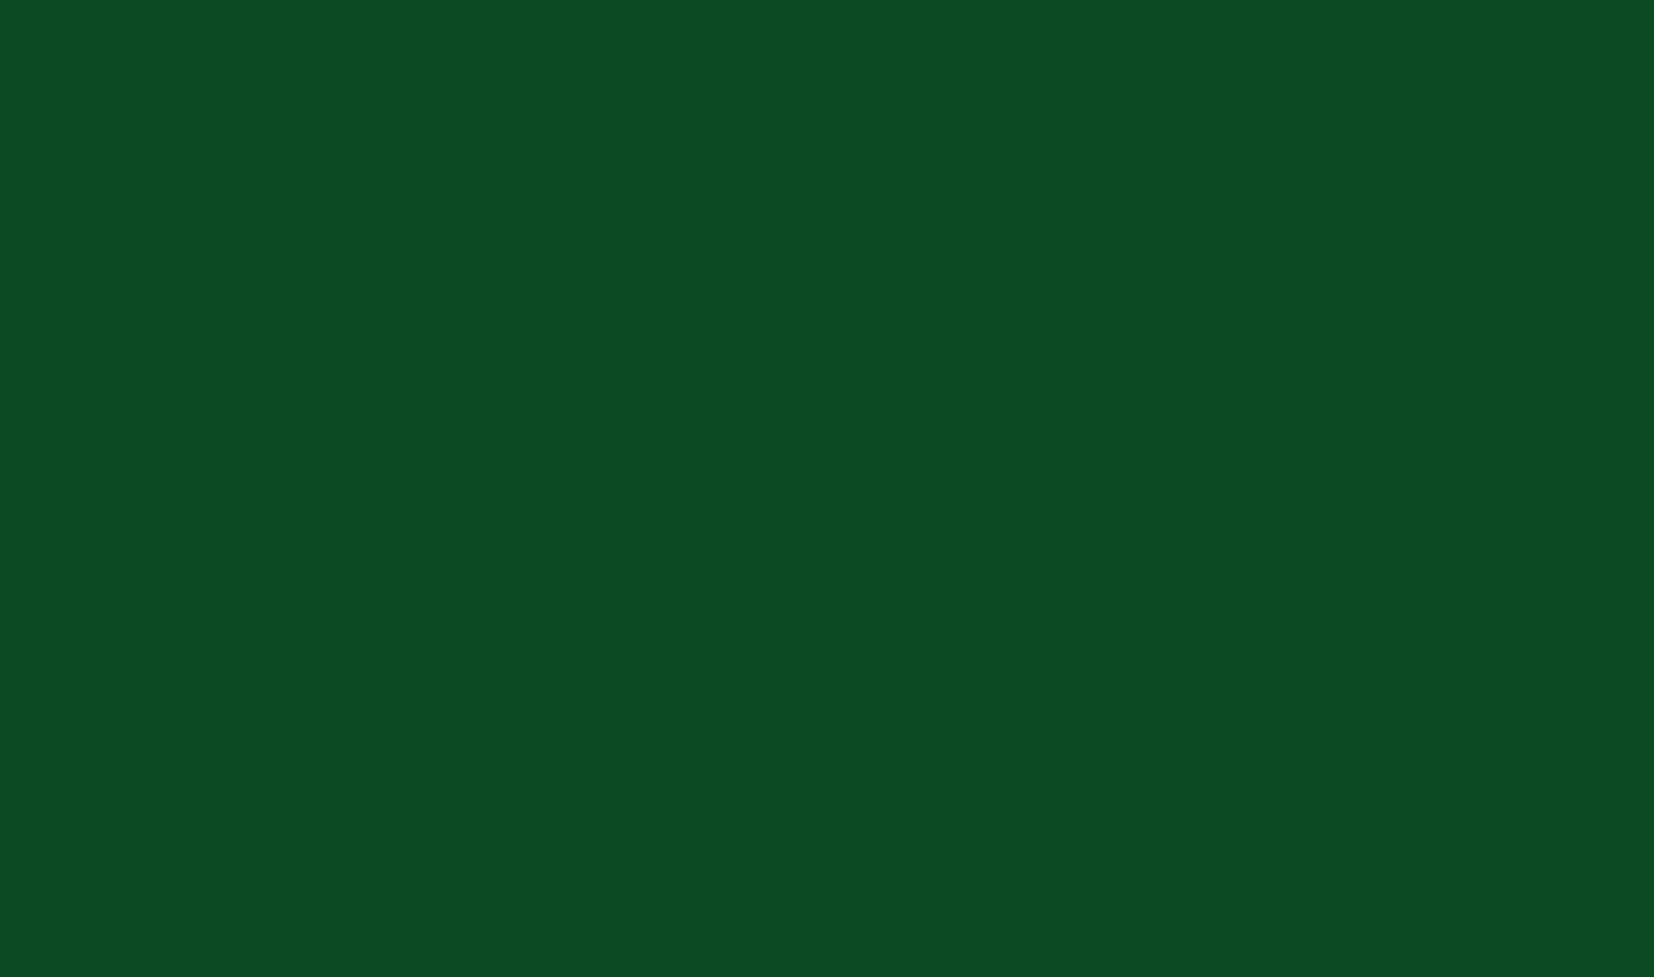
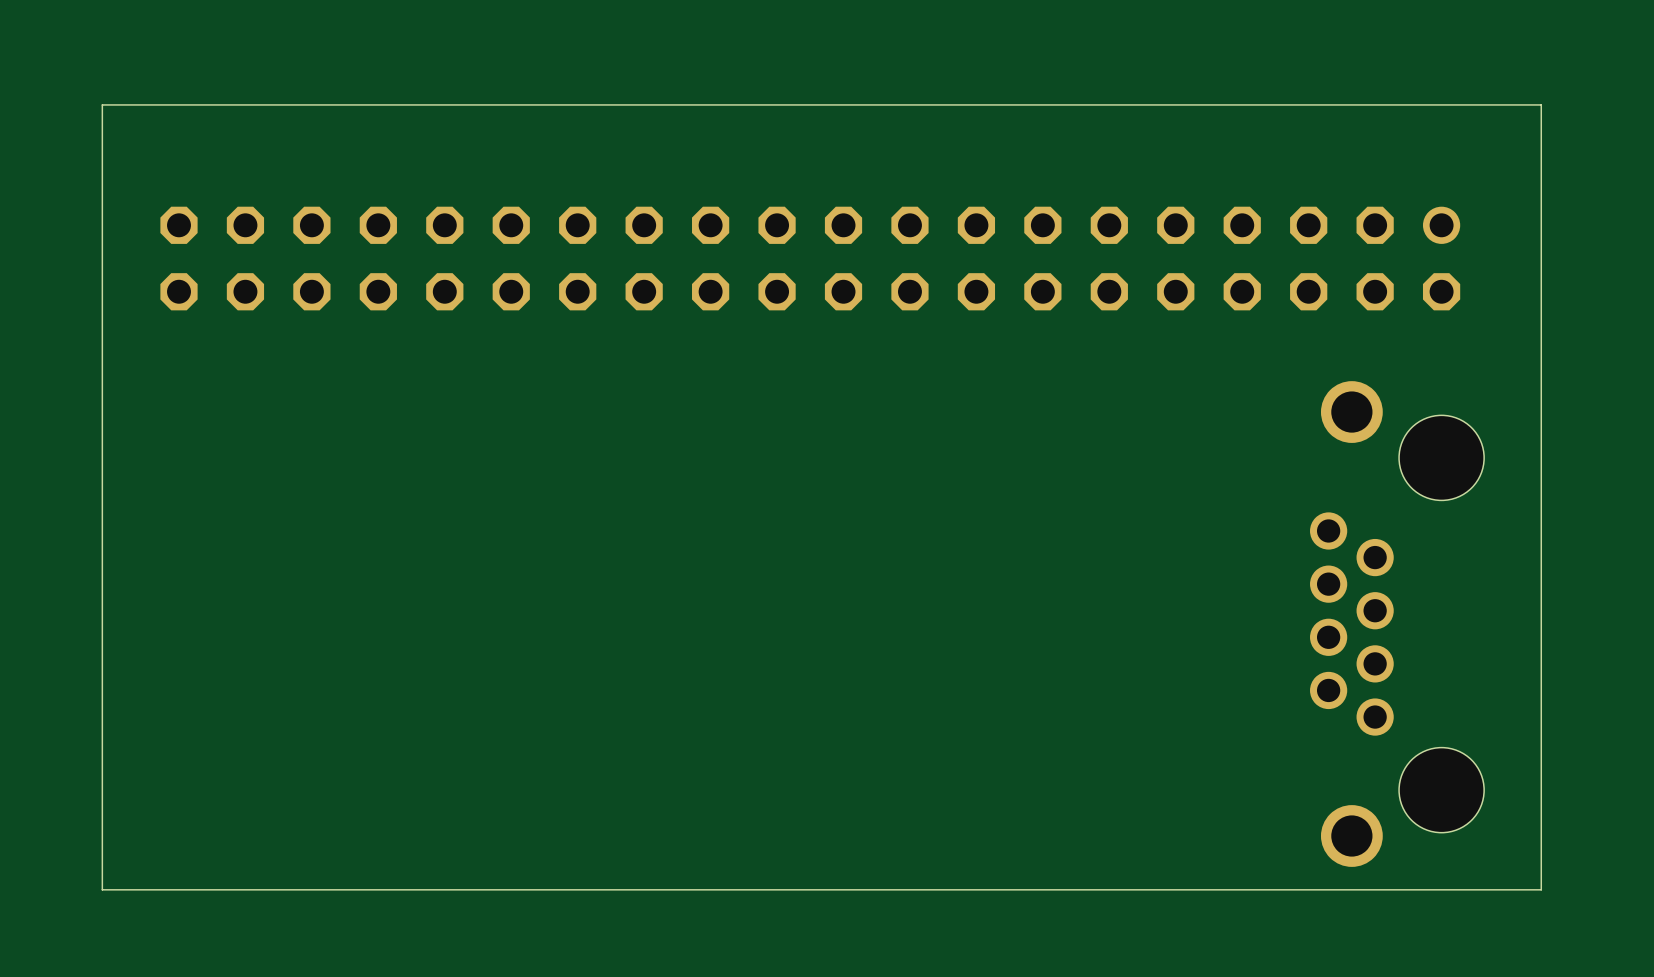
board edge: none -> (1541, 104) (102, 104) (102, 889) (1541, 889) (1541, 104)
part: none -> (810, 258)
part: none -> (1397, 624)

